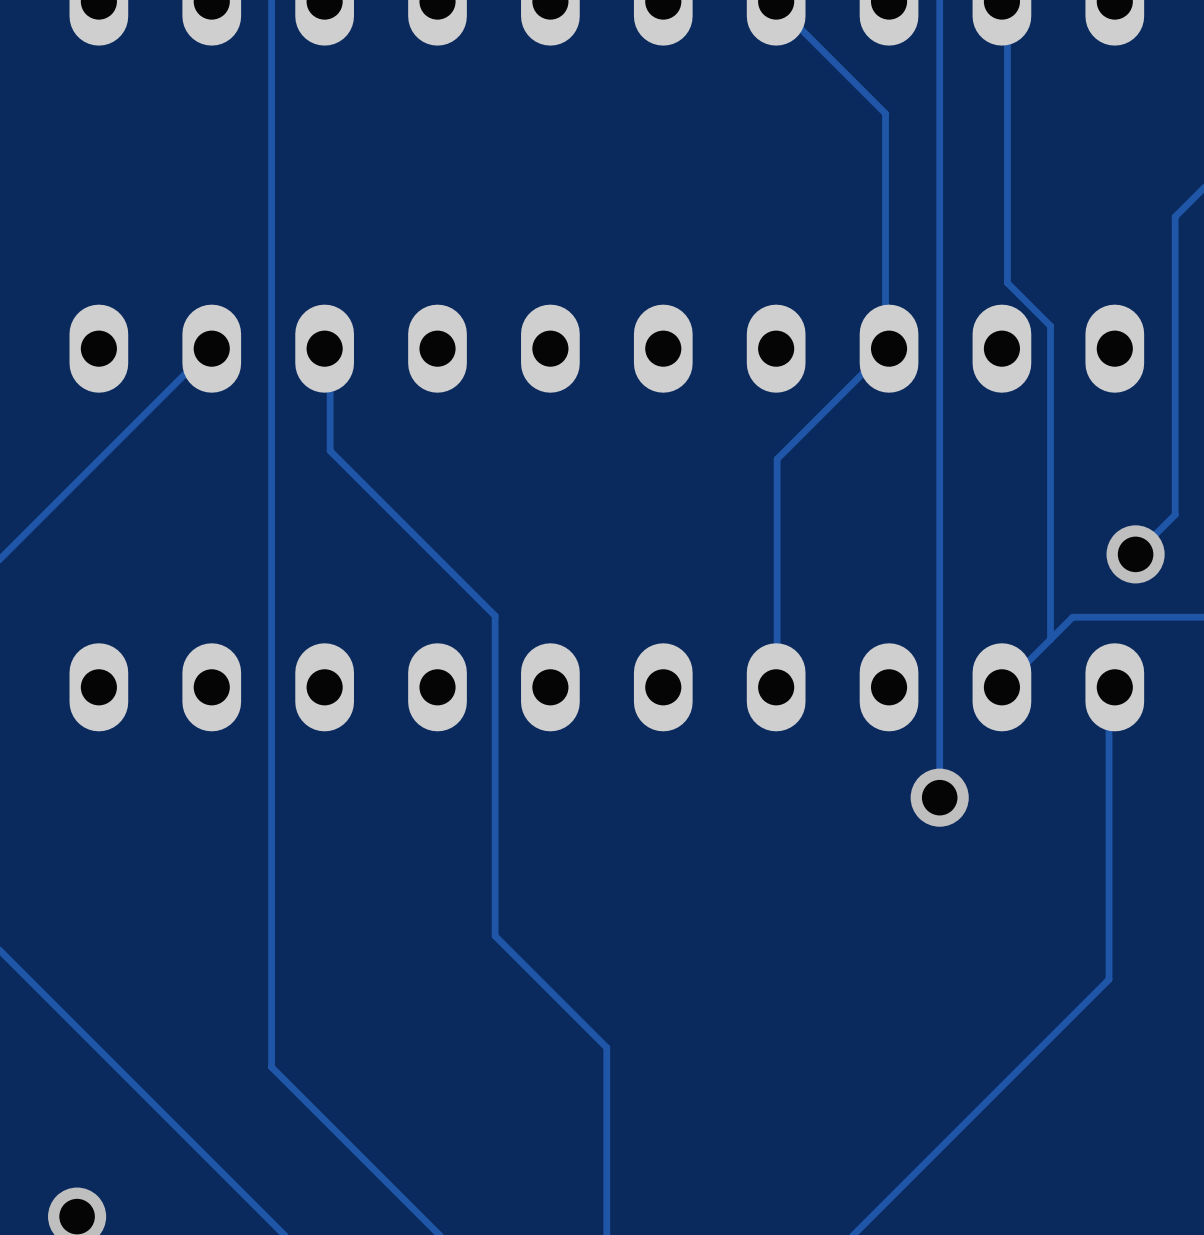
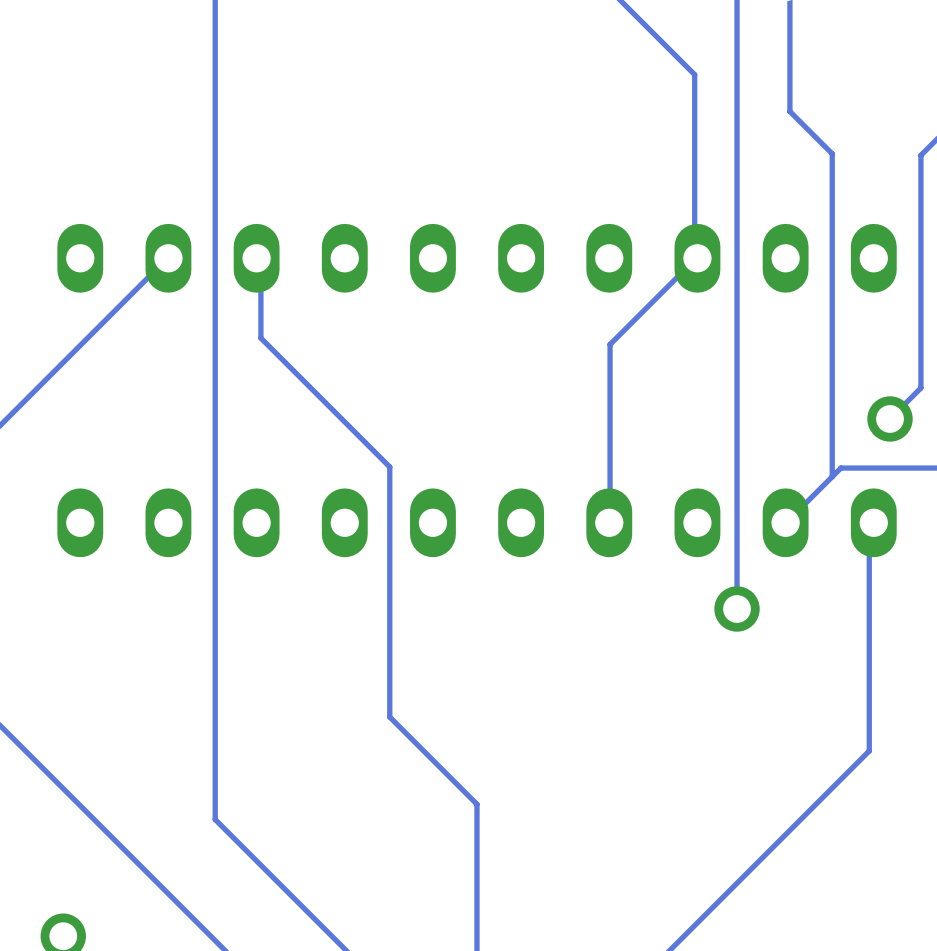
track: (1007, 160) (1007, 282) (1050, 326) (1050, 639) -> (789, 111) (832, 153) (832, 476)

